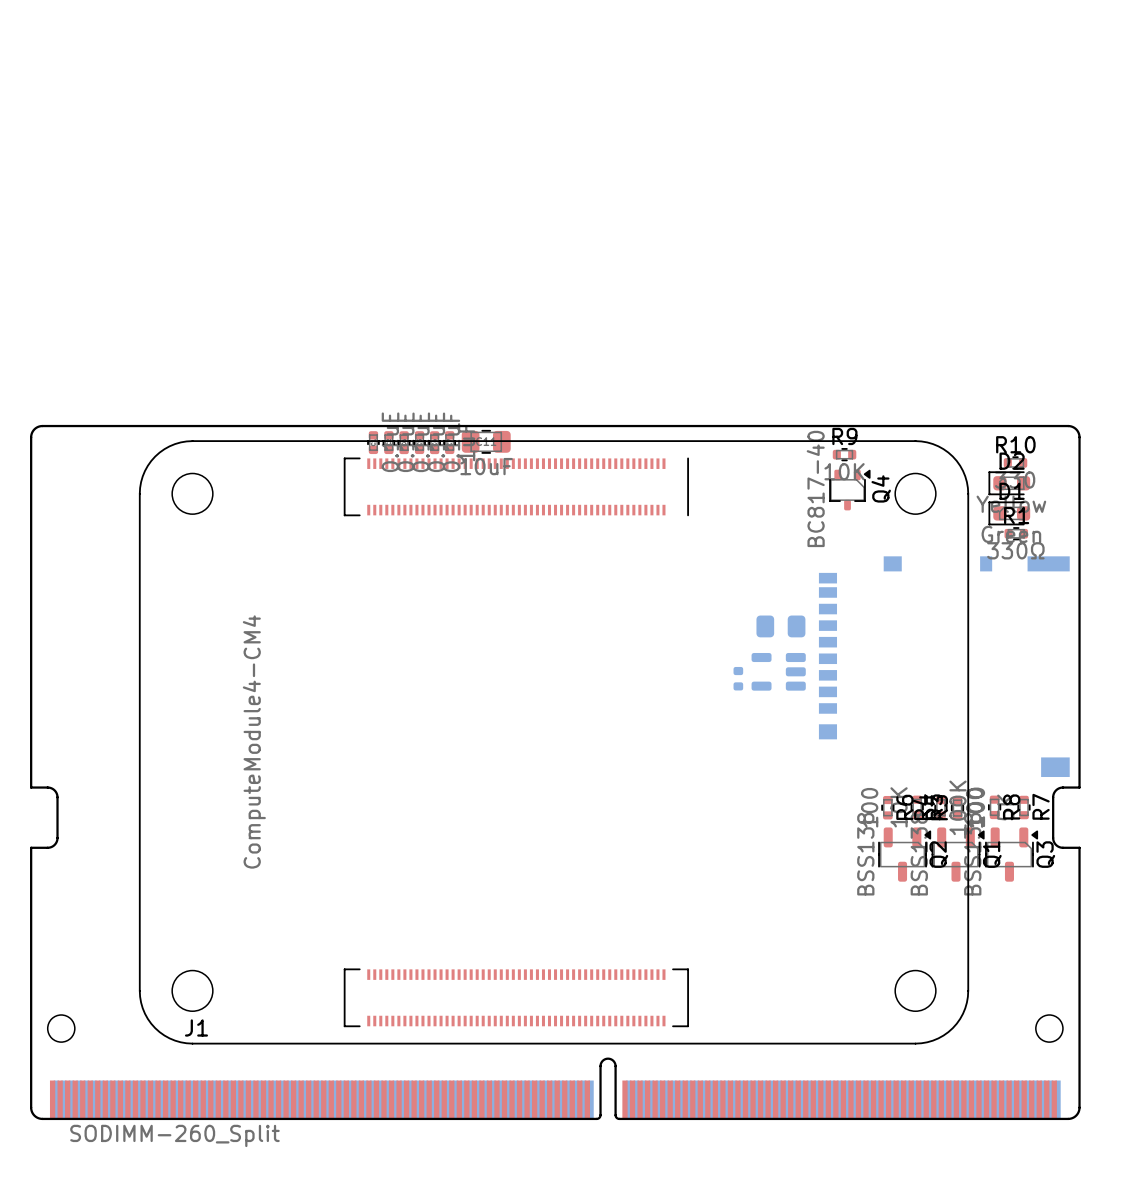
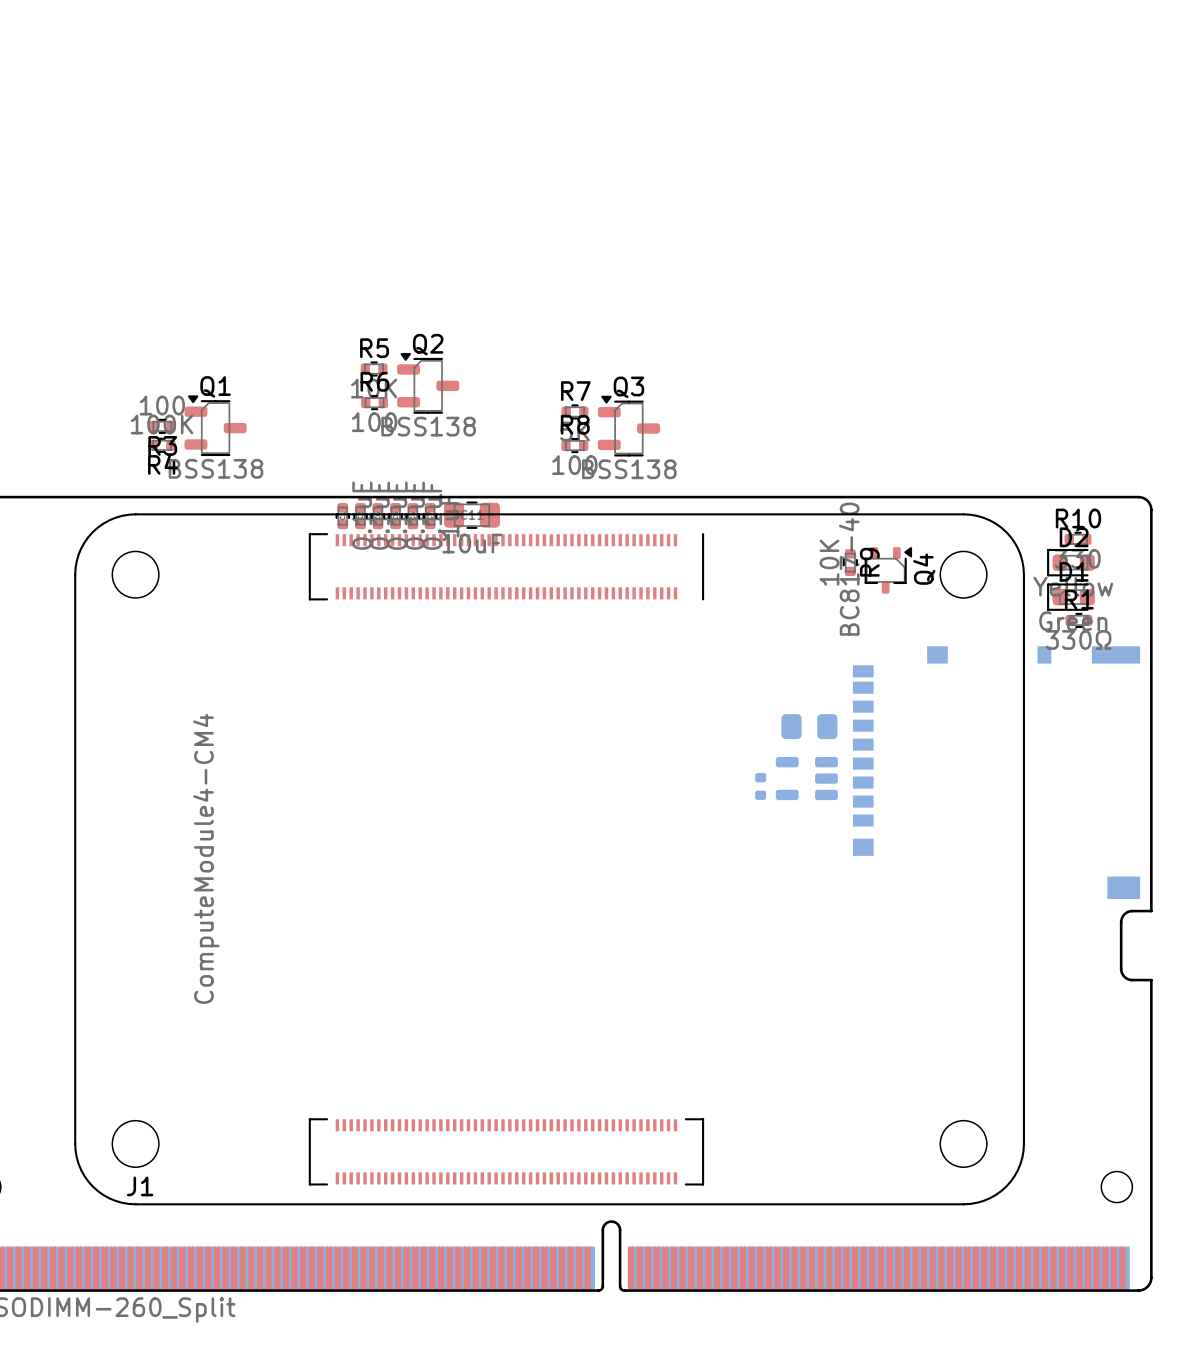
R9 rotation: 0° (844, 454) -> 90° clockwise (850, 562)
R9 position: (844, 454) -> (850, 562)
R6 rotation: 0° (887, 807) -> 90° clockwise (374, 402)
R6 position: (887, 807) -> (374, 402)
R5 rotation: 0° (917, 807) -> 90° clockwise (374, 369)
R5 position: (917, 807) -> (374, 369)
R4 rotation: 0° (940, 807) -> 90° clockwise (162, 445)
R4 position: (940, 807) -> (162, 445)
R8 rotation: 0° (994, 807) -> 90° clockwise (574, 445)
R8 position: (994, 807) -> (574, 445)
R7 rotation: 0° (1023, 807) -> 90° clockwise (575, 411)
R7 position: (1023, 807) -> (575, 411)
R3 rotation: 0° (957, 808) -> 90° clockwise (162, 426)
R3 position: (957, 808) -> (162, 426)
Q2 rotation: 0° (904, 854) -> 90° counterclockwise (428, 383)
Q2 position: (904, 854) -> (428, 383)
Q1 rotation: 0° (958, 854) -> 90° counterclockwise (215, 425)
Q1 position: (958, 854) -> (215, 425)
Q3 rotation: 0° (1011, 854) -> 90° counterclockwise (628, 426)
Q3 position: (1011, 854) -> (628, 426)

